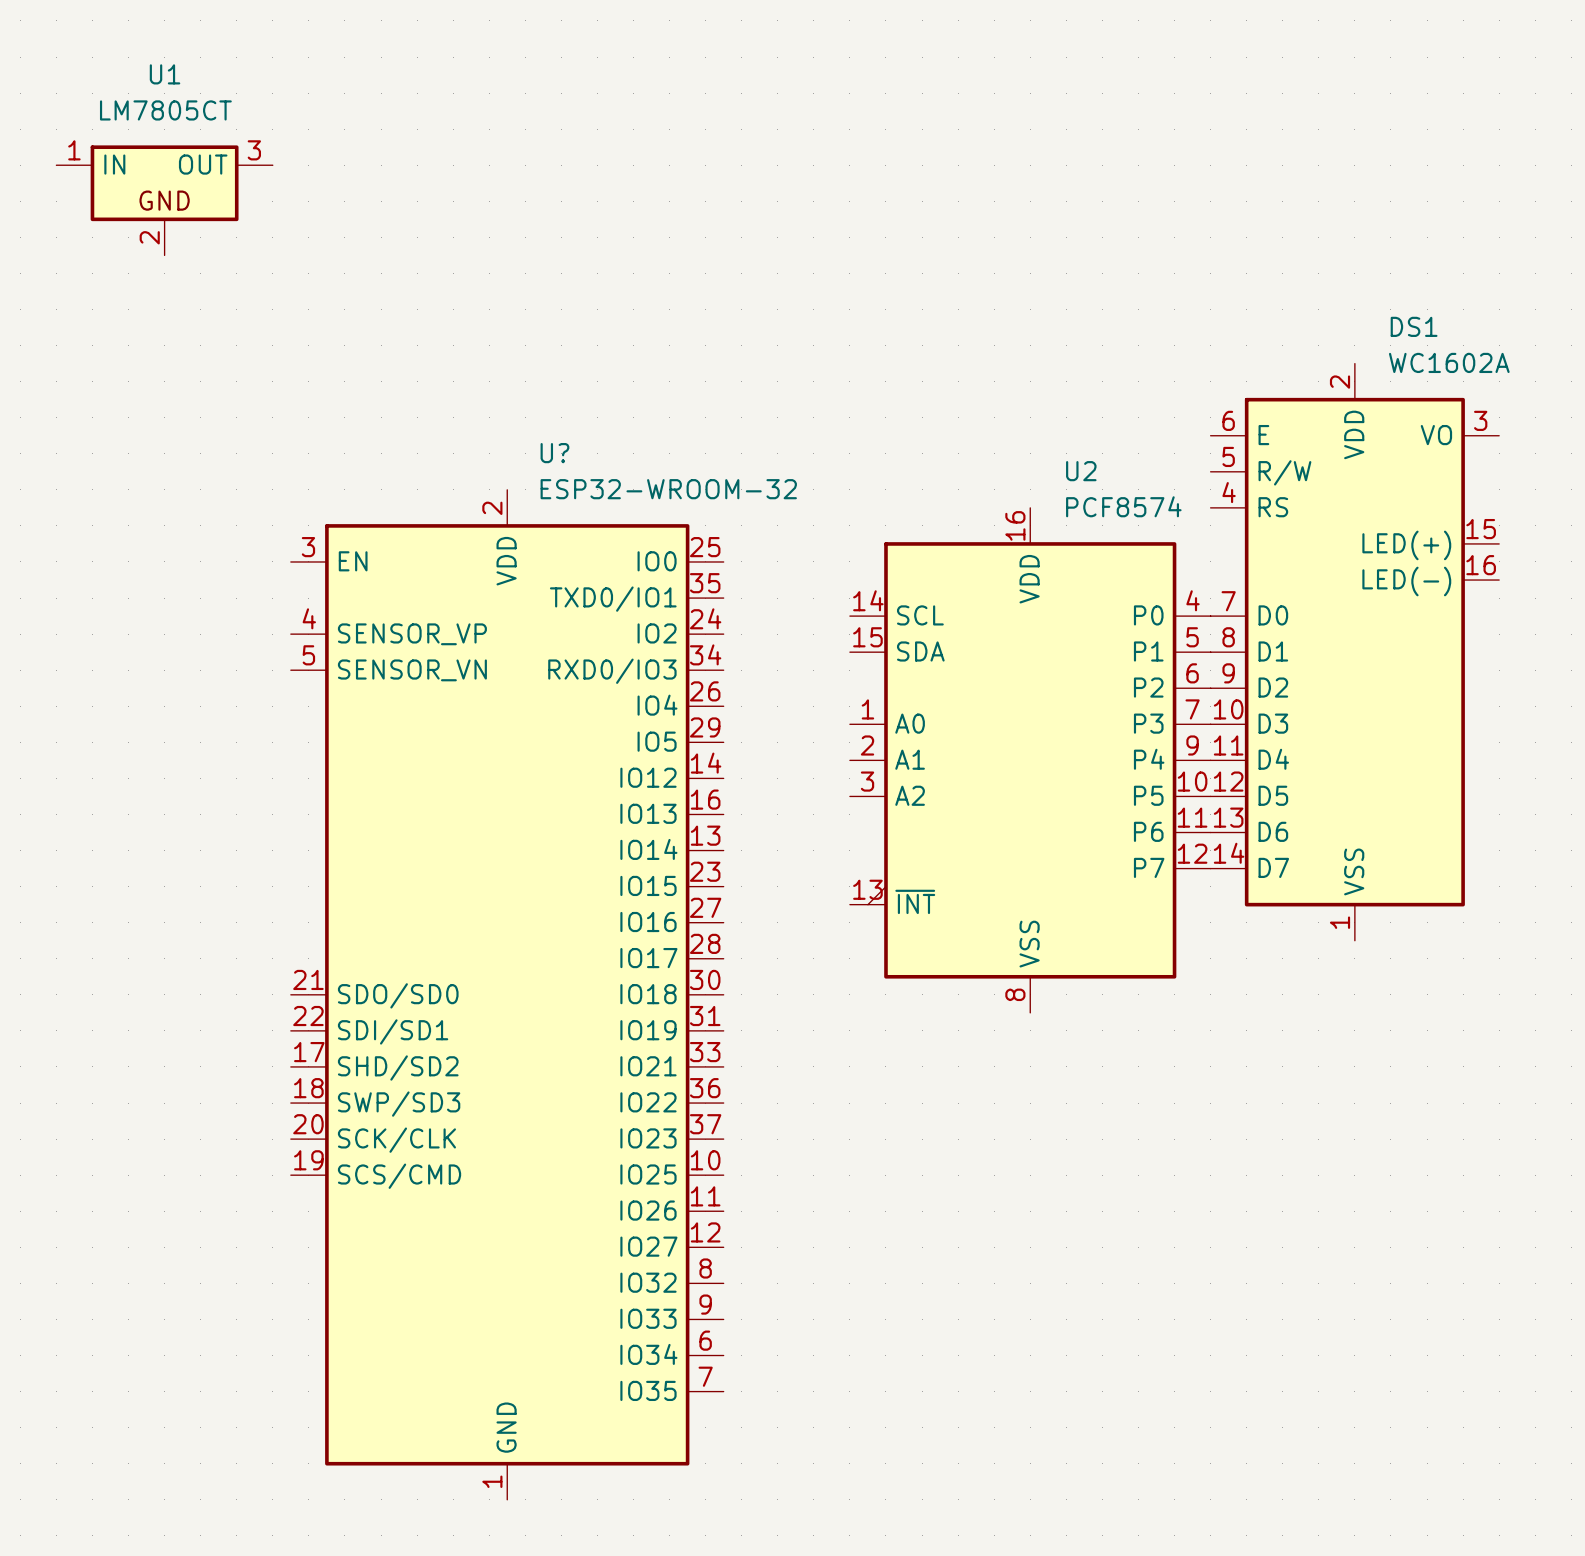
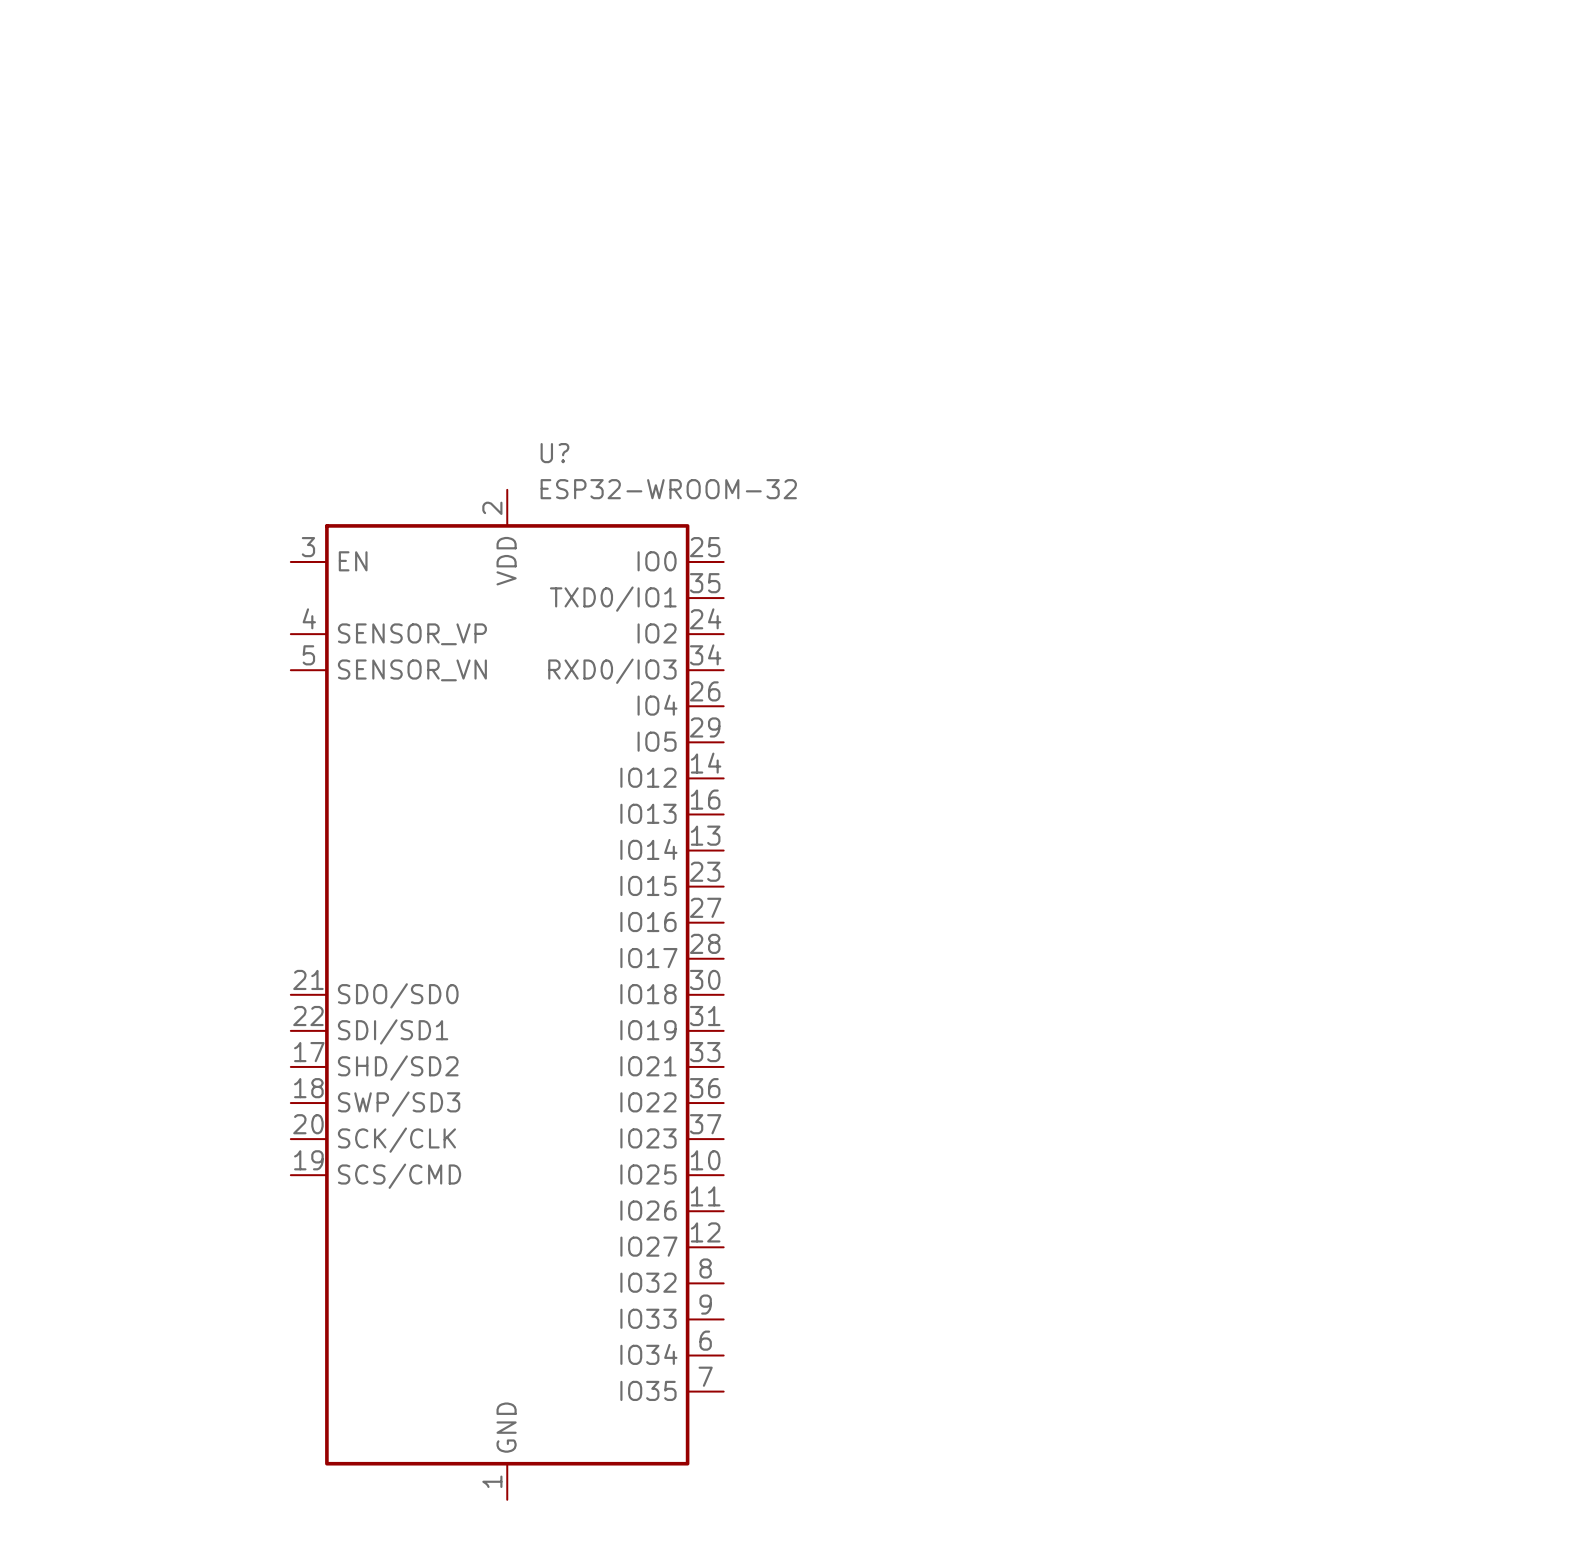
U1: LM7805CT (164, 200) -> none
DS1: WC1602A (1354, 652) -> none
U2: PCF8574 (1030, 760) -> none

